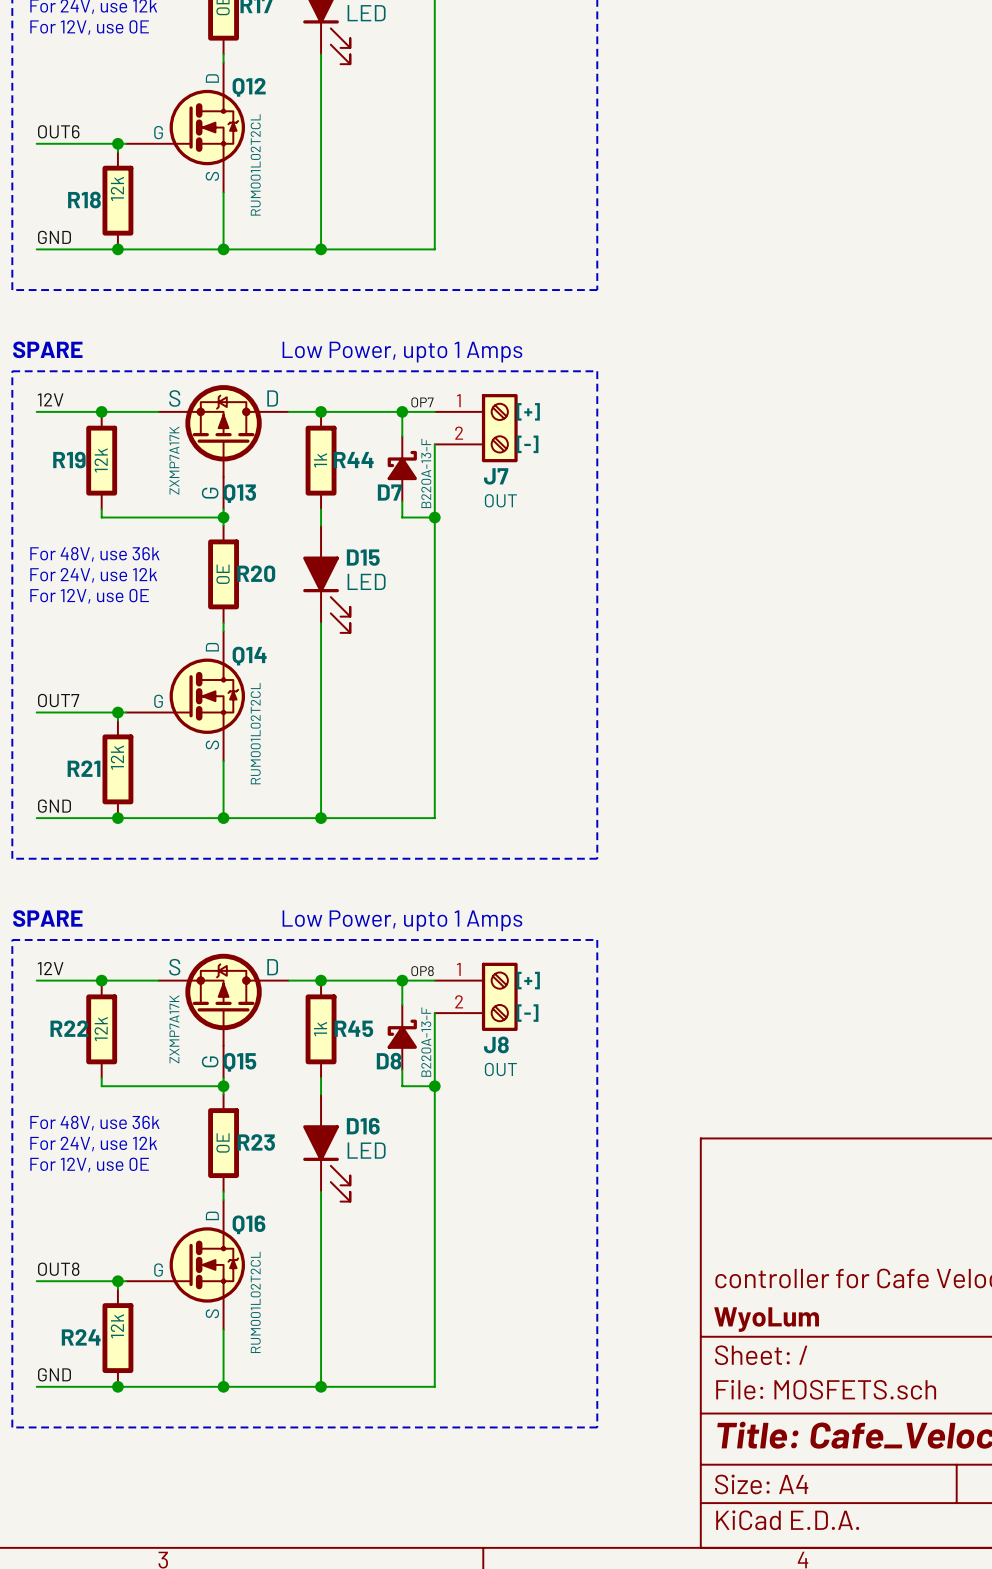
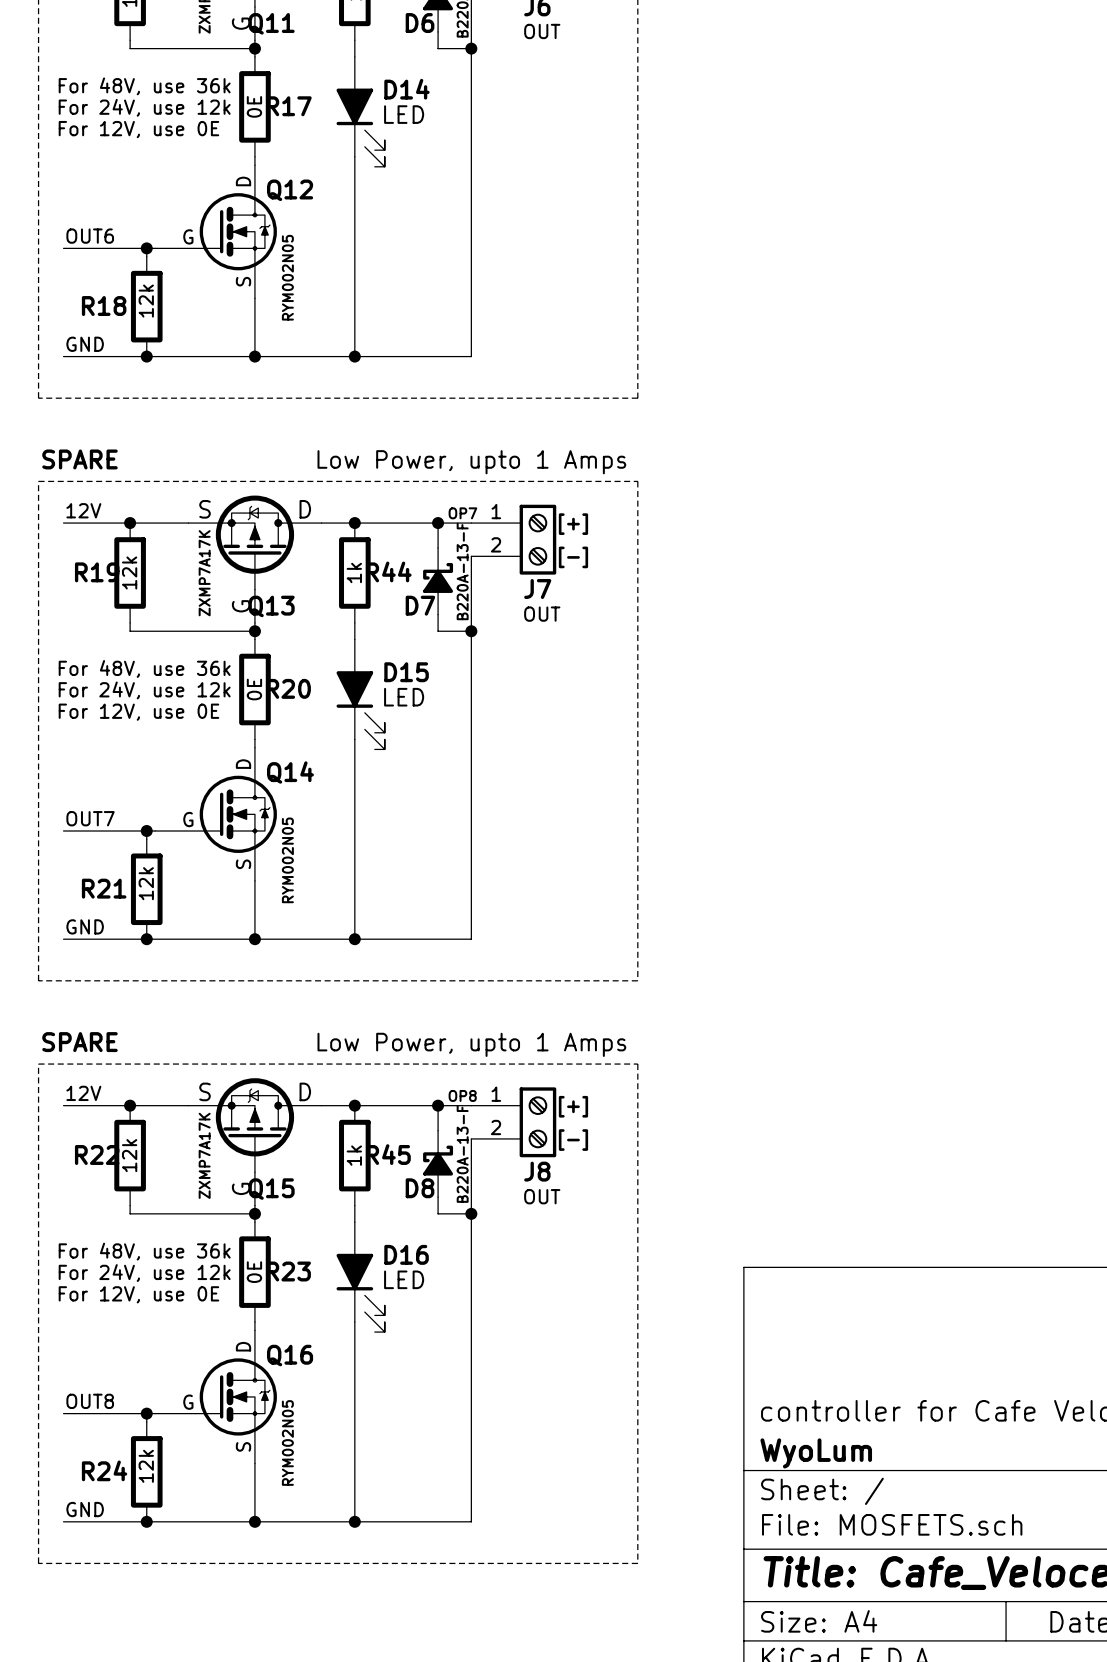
Q12 value: RUM001L02T2CL (255, 164) -> RYM002N05 (287, 277)
Q14 value: RUM001L02T2CL (255, 733) -> RYM002N05 (287, 860)
Q16 value: RUM001L02T2CL (255, 1302) -> RYM002N05 (287, 1442)

